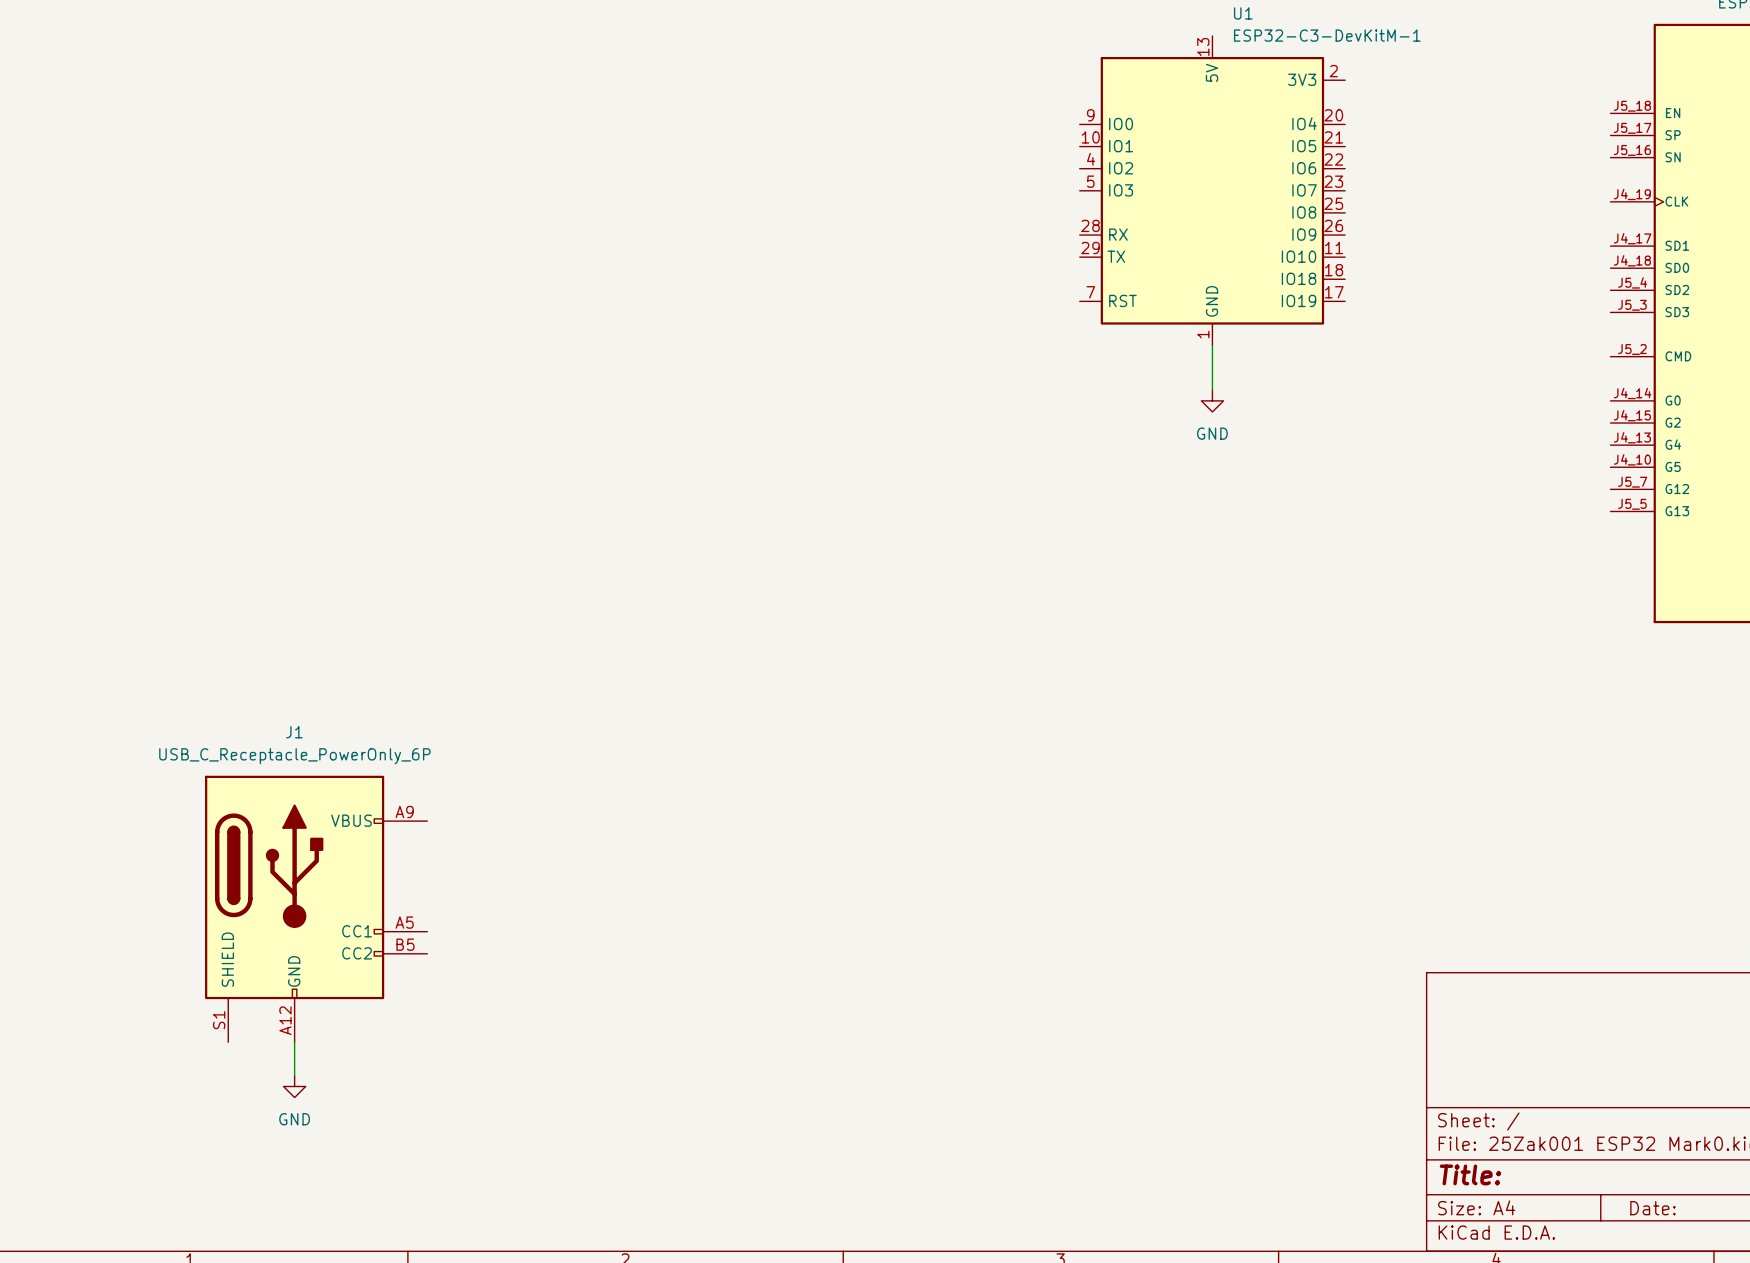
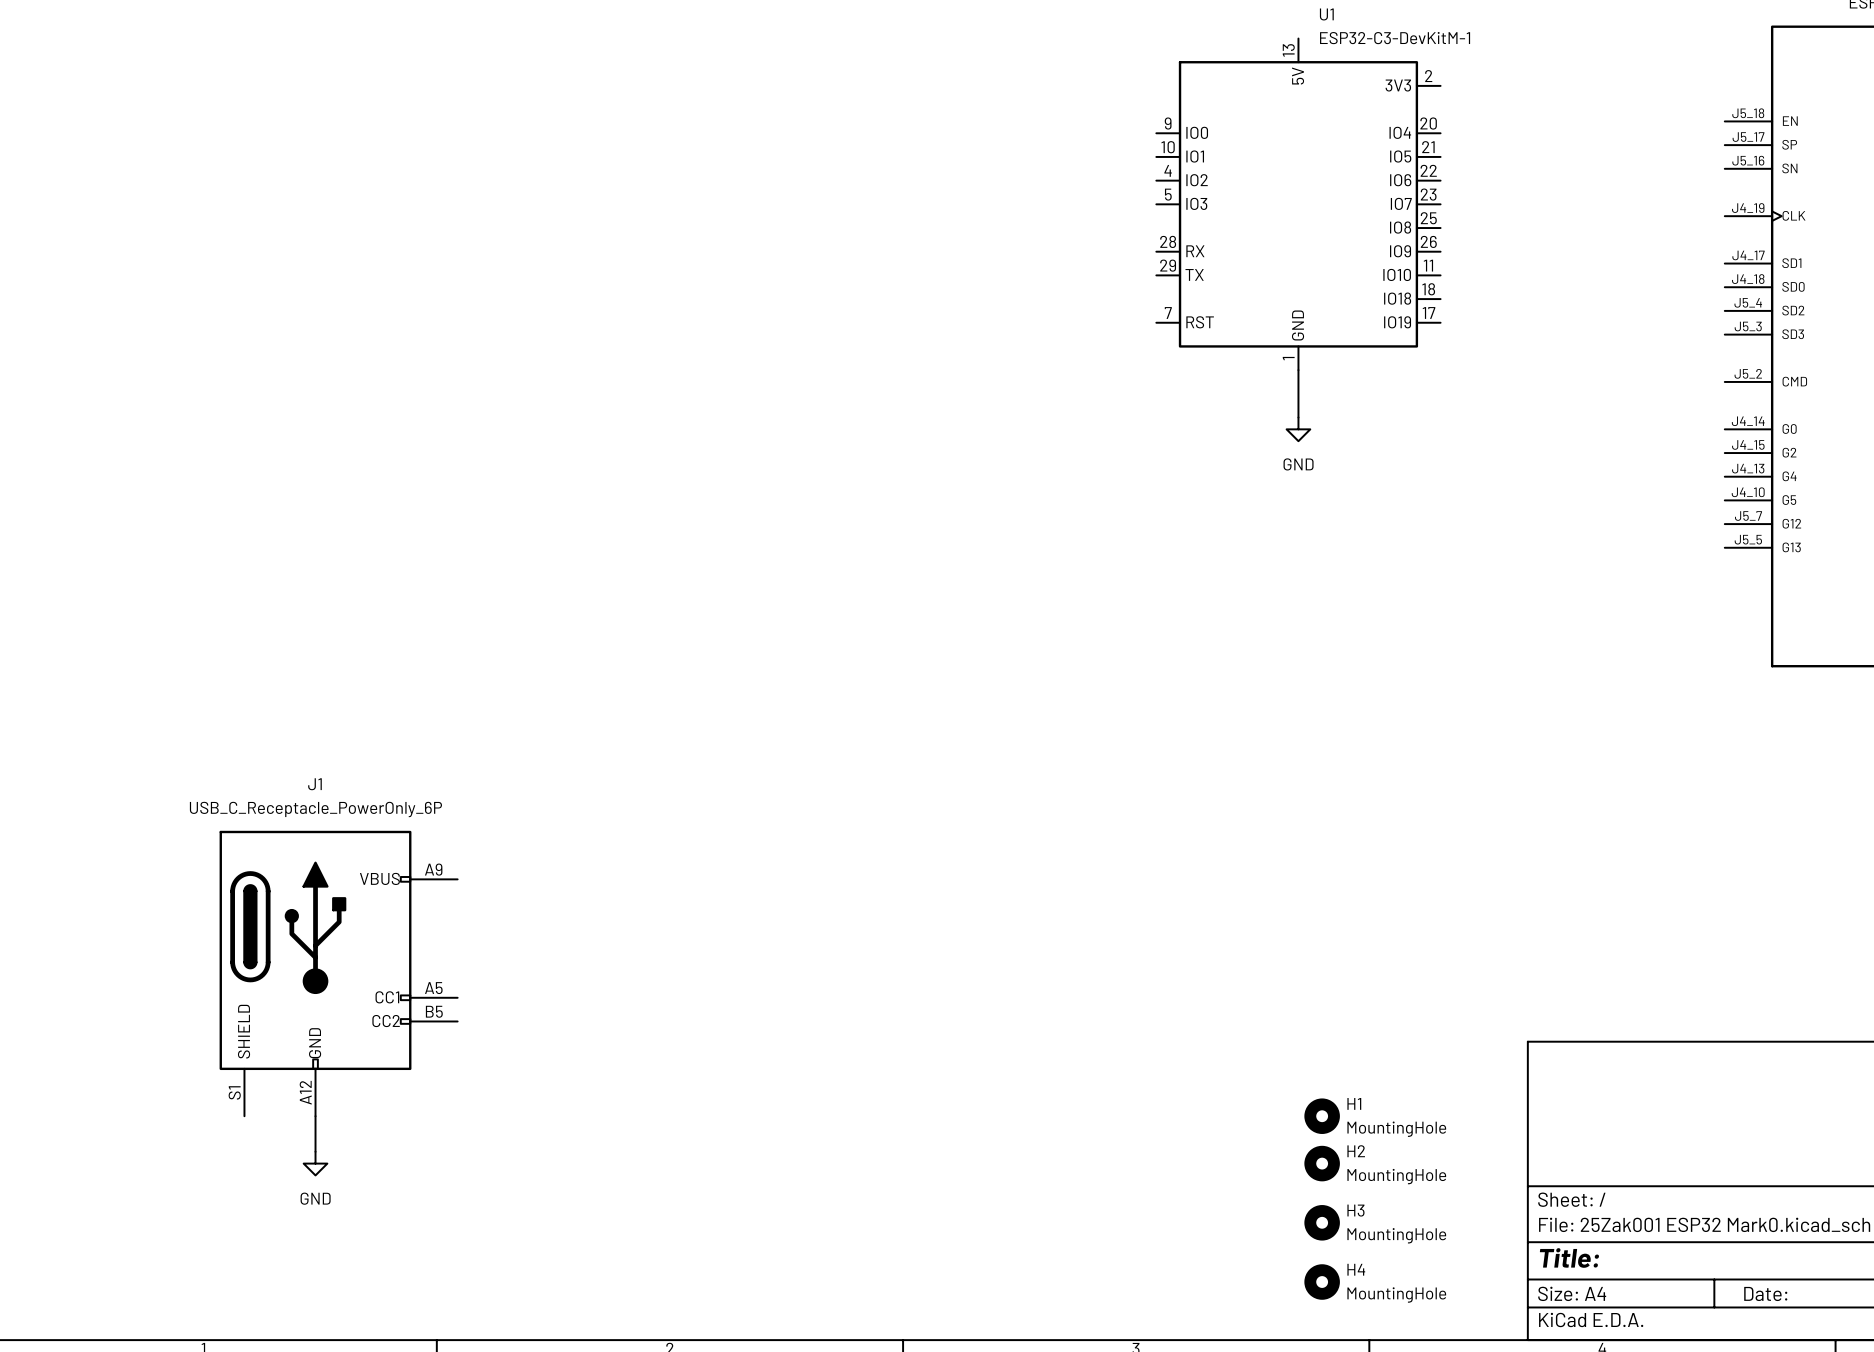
H1: none -> MountingHole (1322, 1116)
H2: none -> MountingHole (1322, 1163)
H3: none -> MountingHole (1322, 1222)
H4: none -> MountingHole (1322, 1282)

